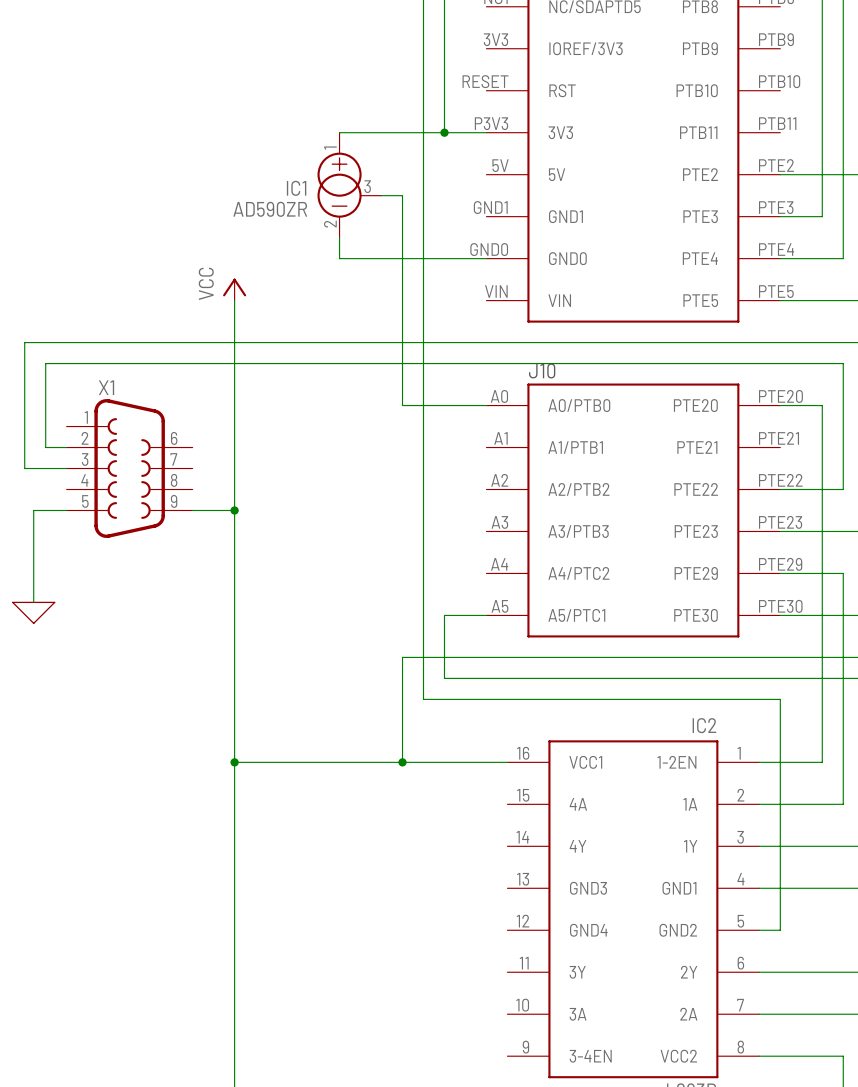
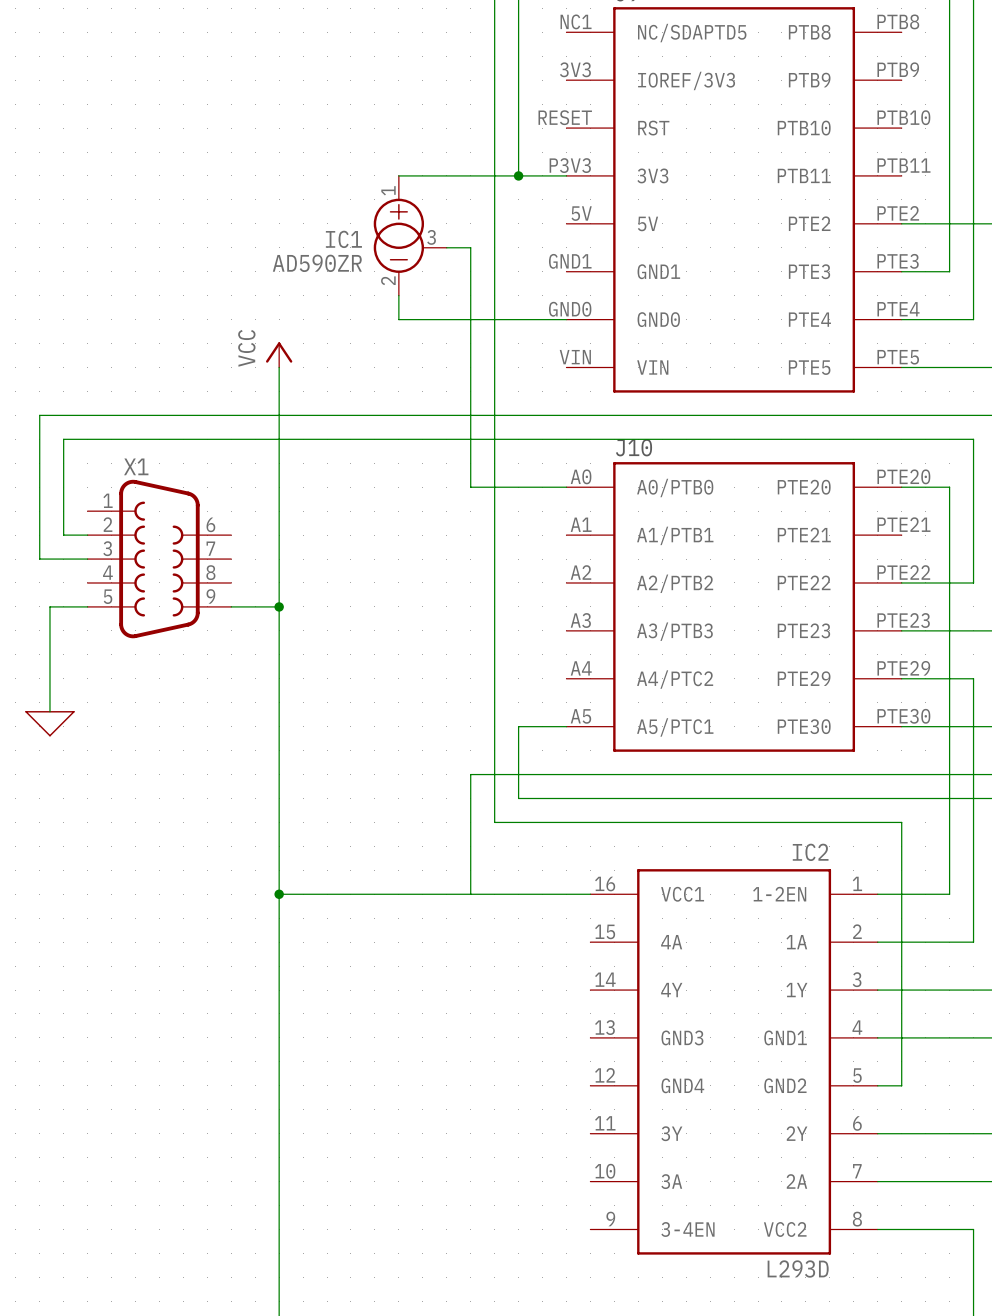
junction: (402, 762) -> none

